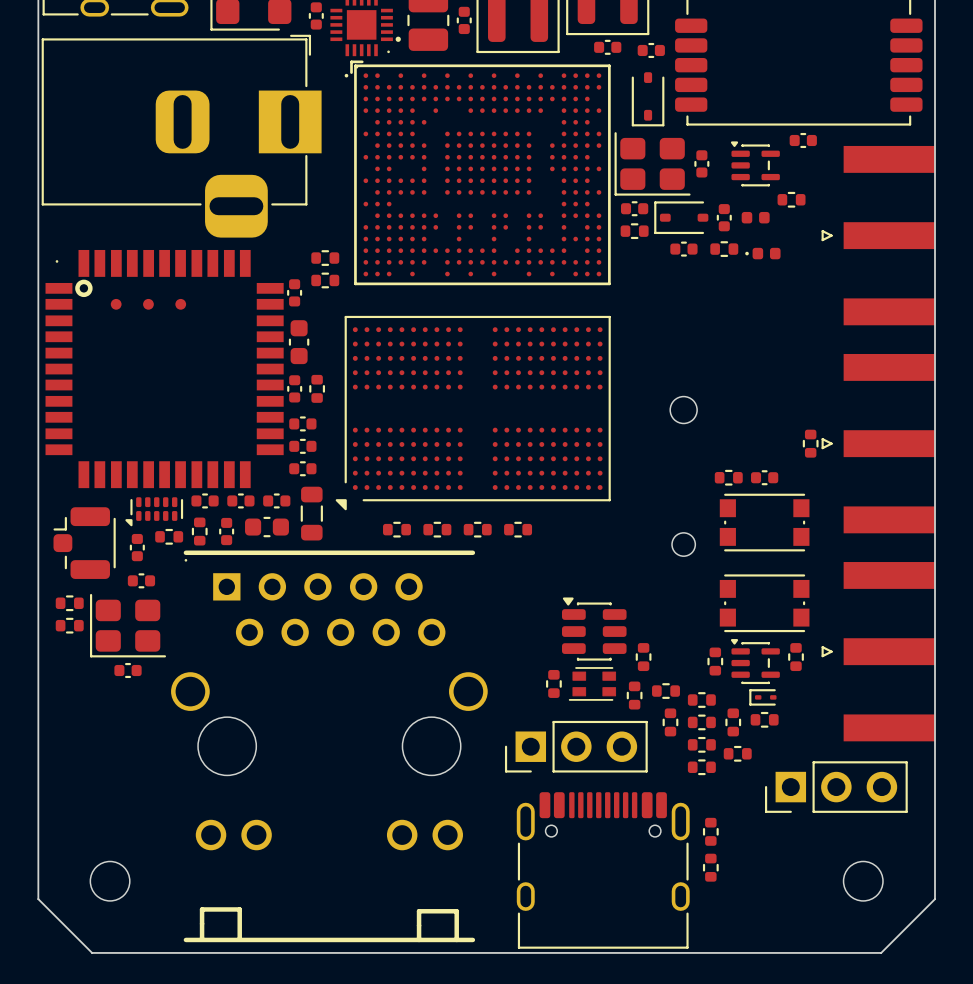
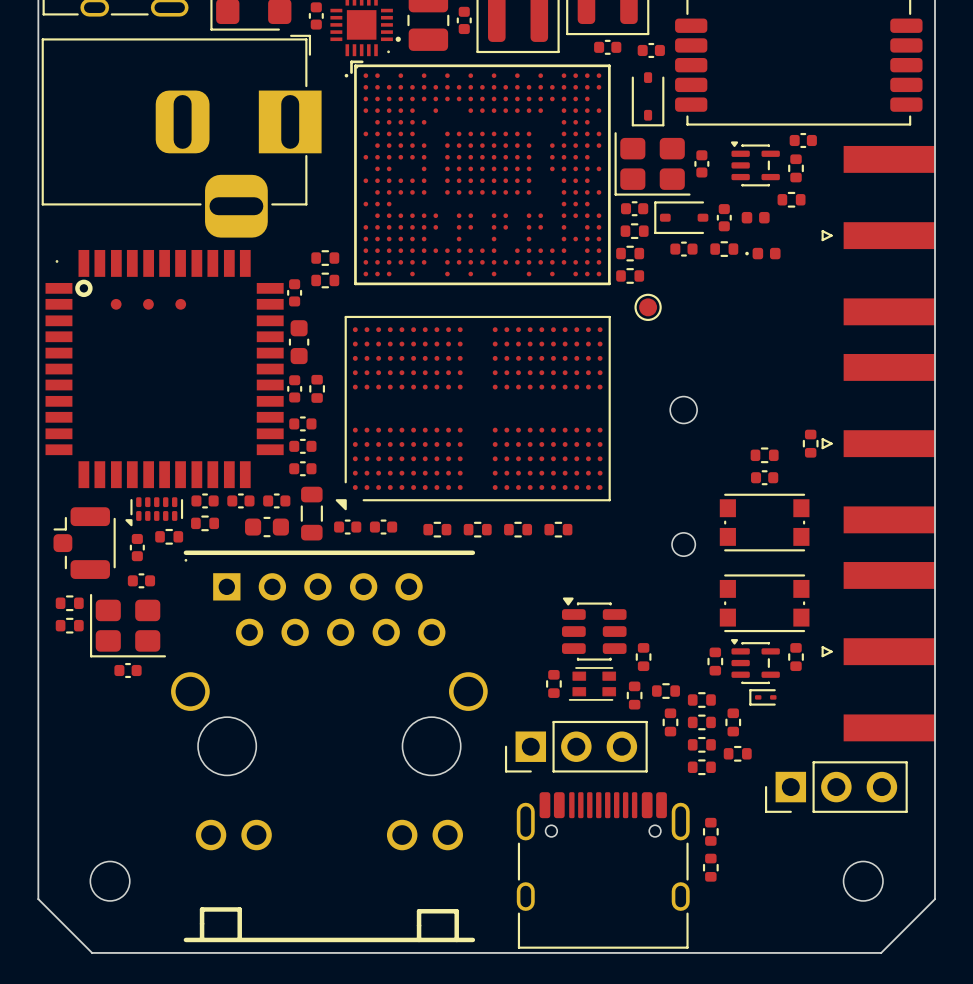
part: none -> (796, 168)
part: none -> (630, 253)
part: none -> (630, 275)
part: none -> (648, 307)
part position: (728, 477) -> (764, 455)
part footprint: [383, 521, 411, 538] -> [369, 519, 398, 535]
part: none -> (558, 529)
part rotation: 0° (199, 531) -> 90° clockwise (205, 523)
part rotation: 0° (226, 531) -> 90° clockwise (347, 527)
part position: (226, 531) -> (347, 527)
part: (764, 719) -> none

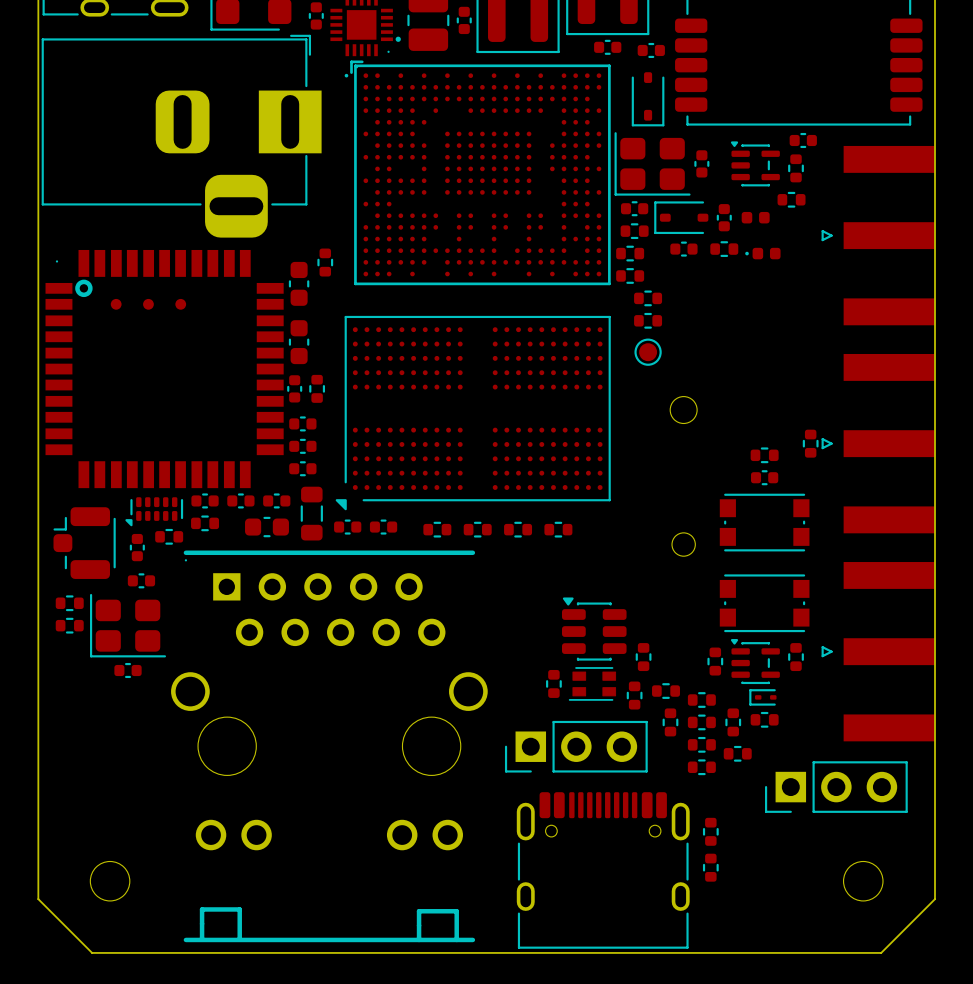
part rotation: 0° (325, 258) -> 90° clockwise (325, 262)
part footprint: [287, 279, 303, 307] -> [288, 261, 310, 306]
part: (325, 280) -> none
part: none -> (648, 298)
part position: (648, 307) -> (648, 352)
part: none -> (648, 320)
part: none -> (764, 719)

